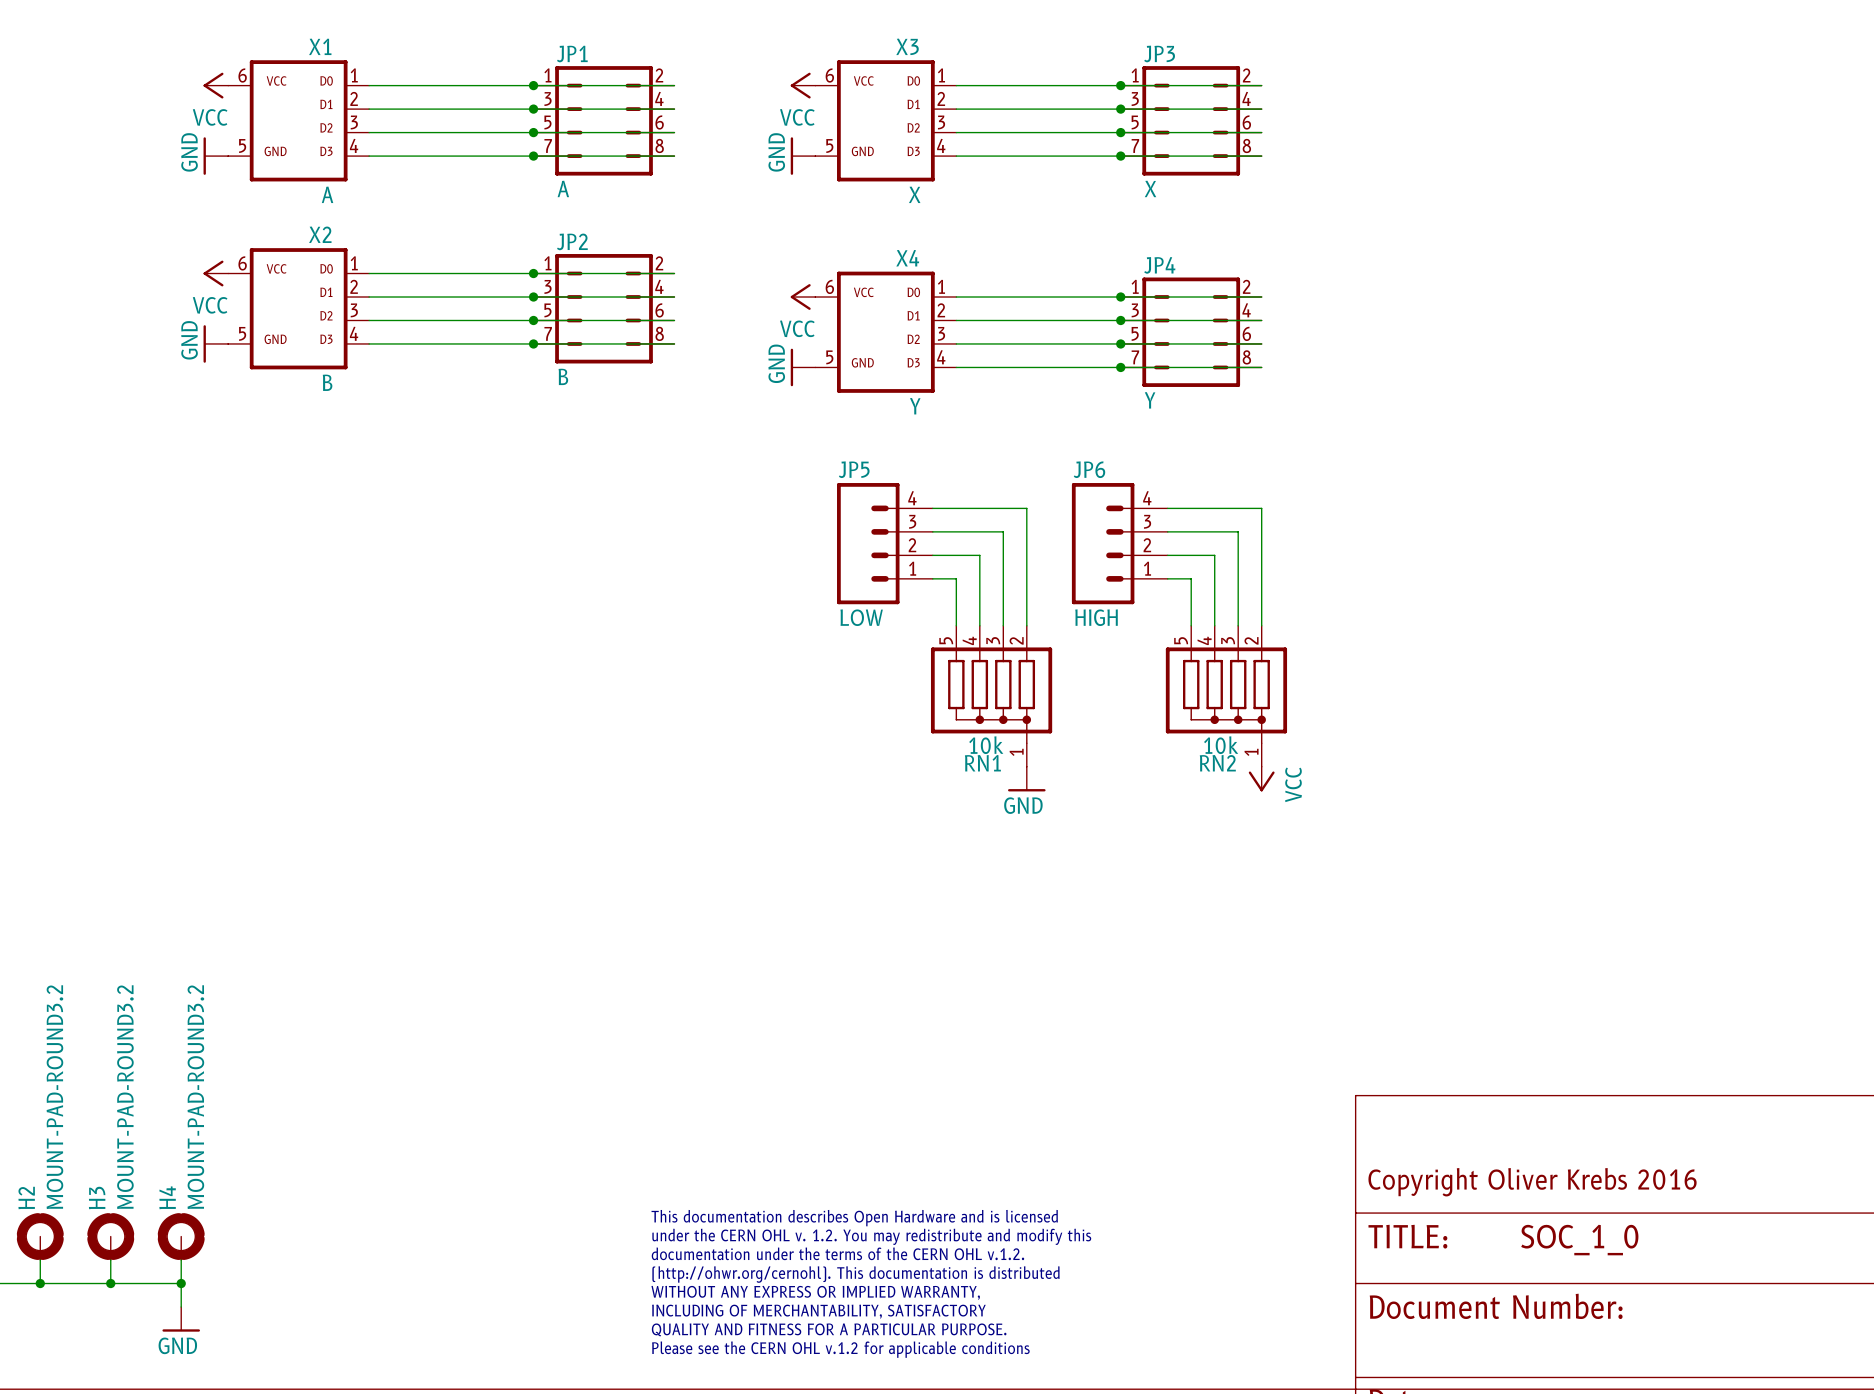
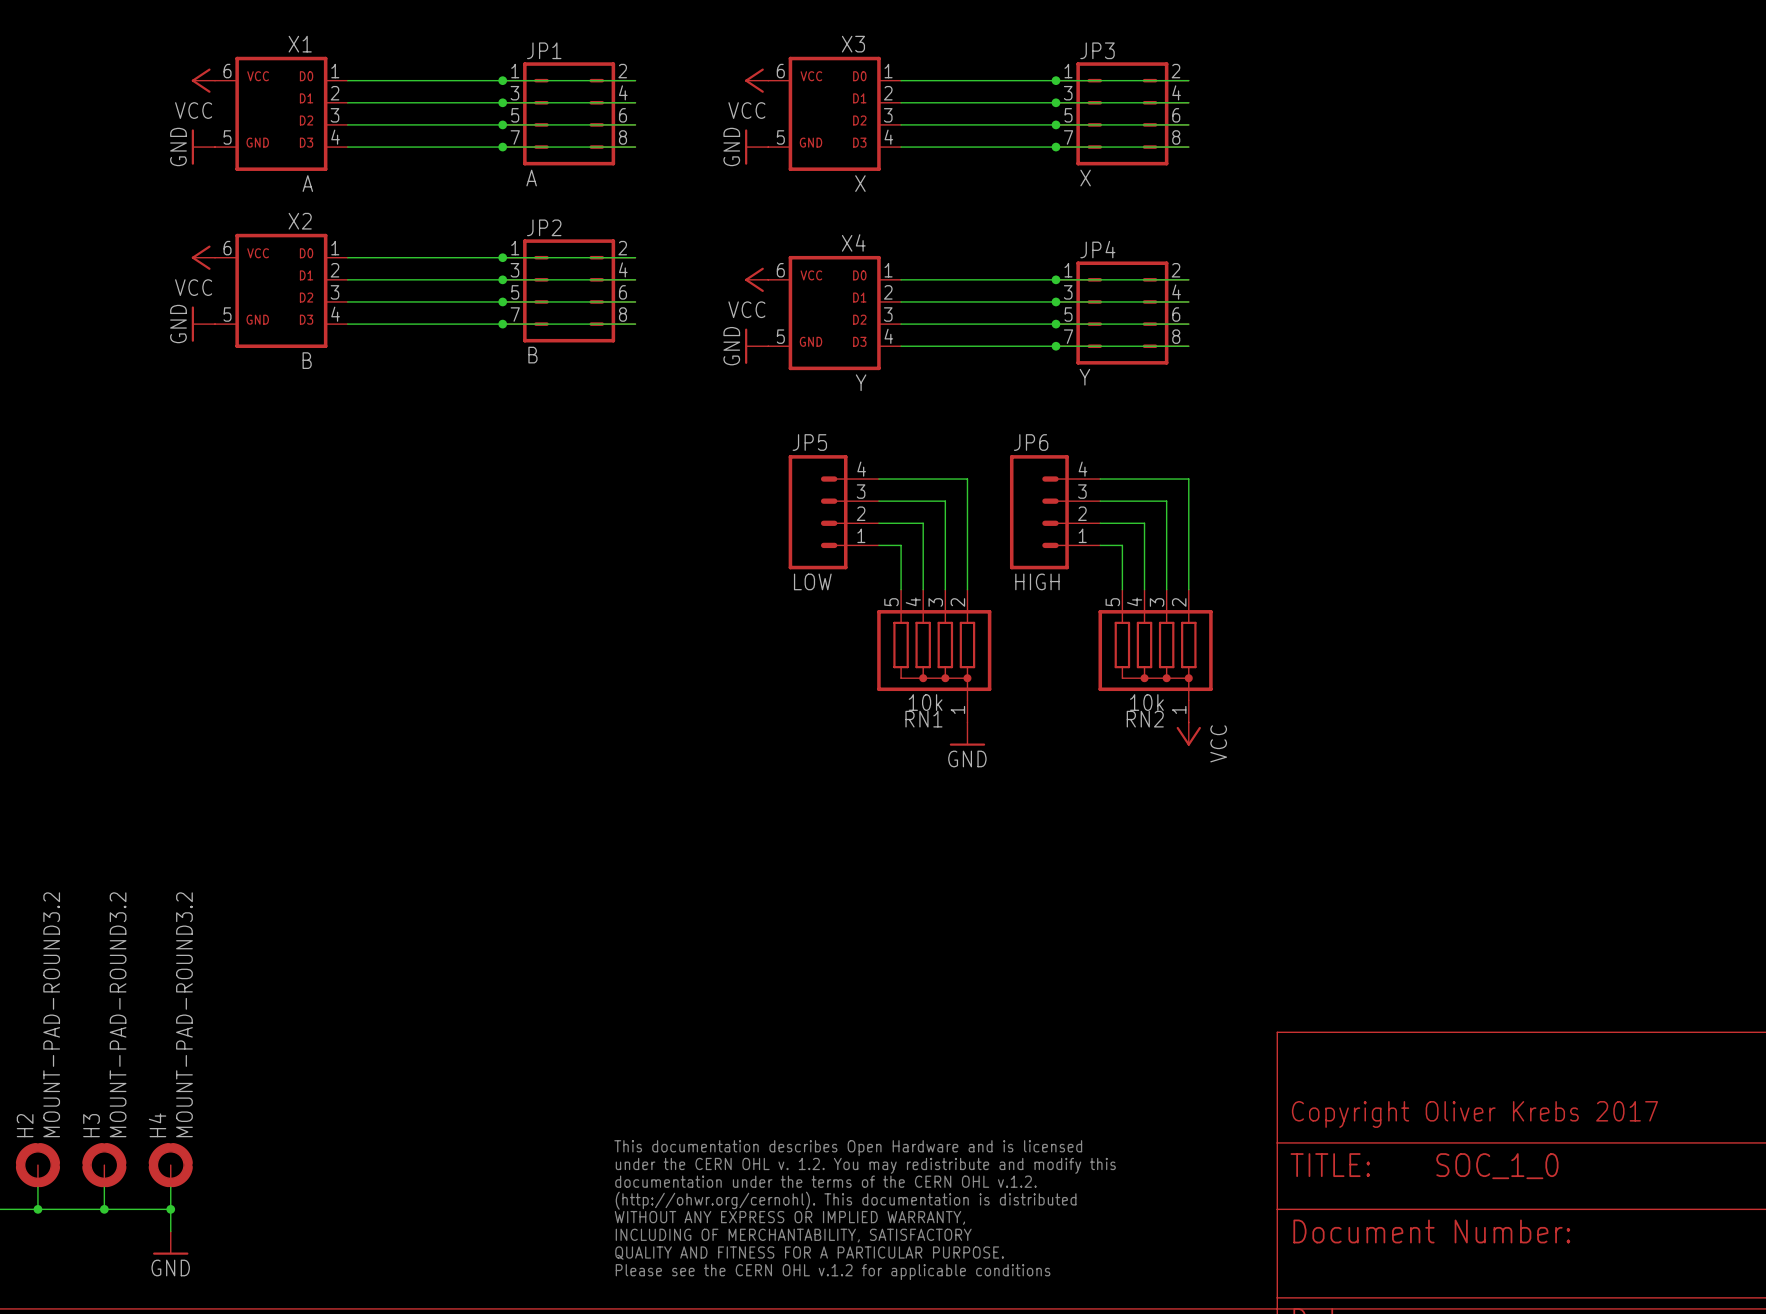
text: Copyright Oliver Krebs 2016 (1532, 1182) -> Copyright Oliver Krebs 2017 (1474, 1114)

